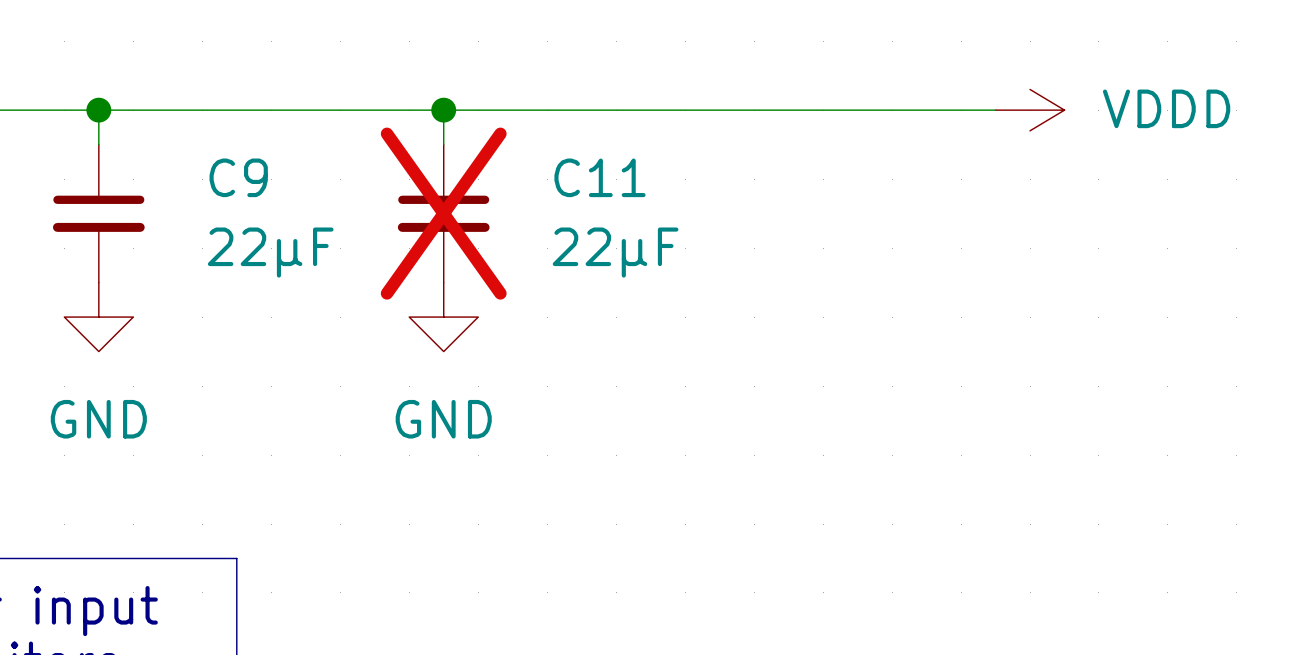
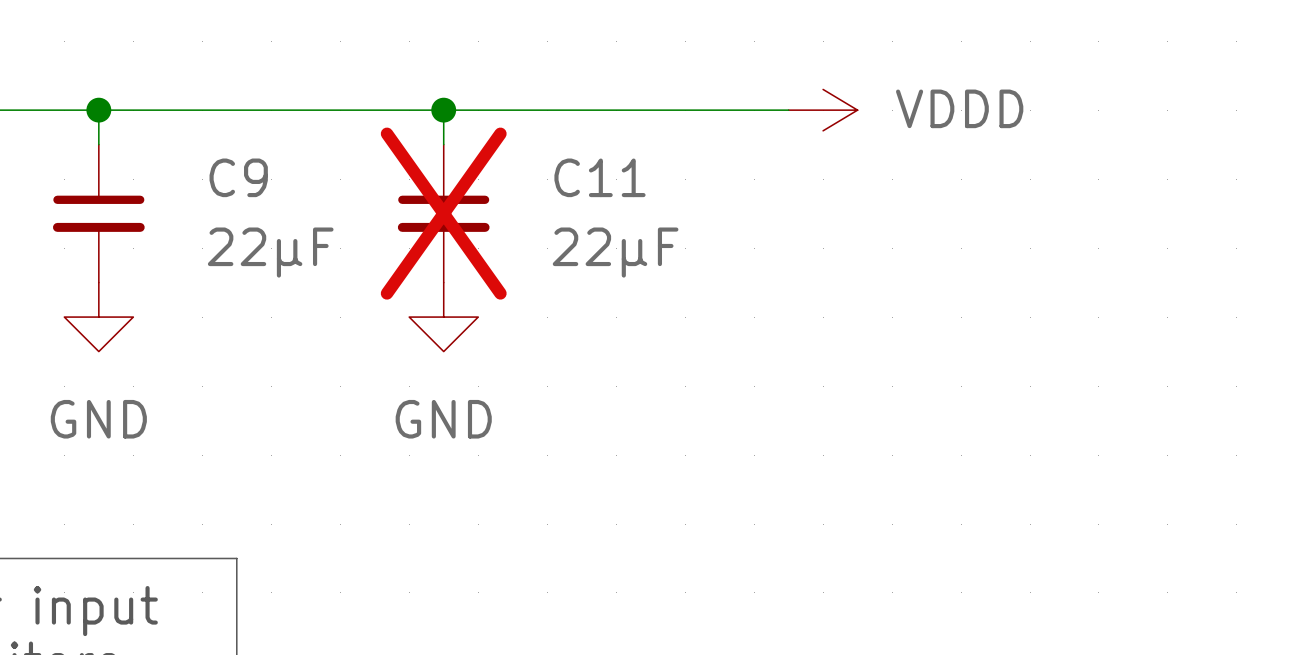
wire: (788, 110) (995, 110) -> none
power symbol position: VDDD (1030, 110) -> VDDD (823, 110)

